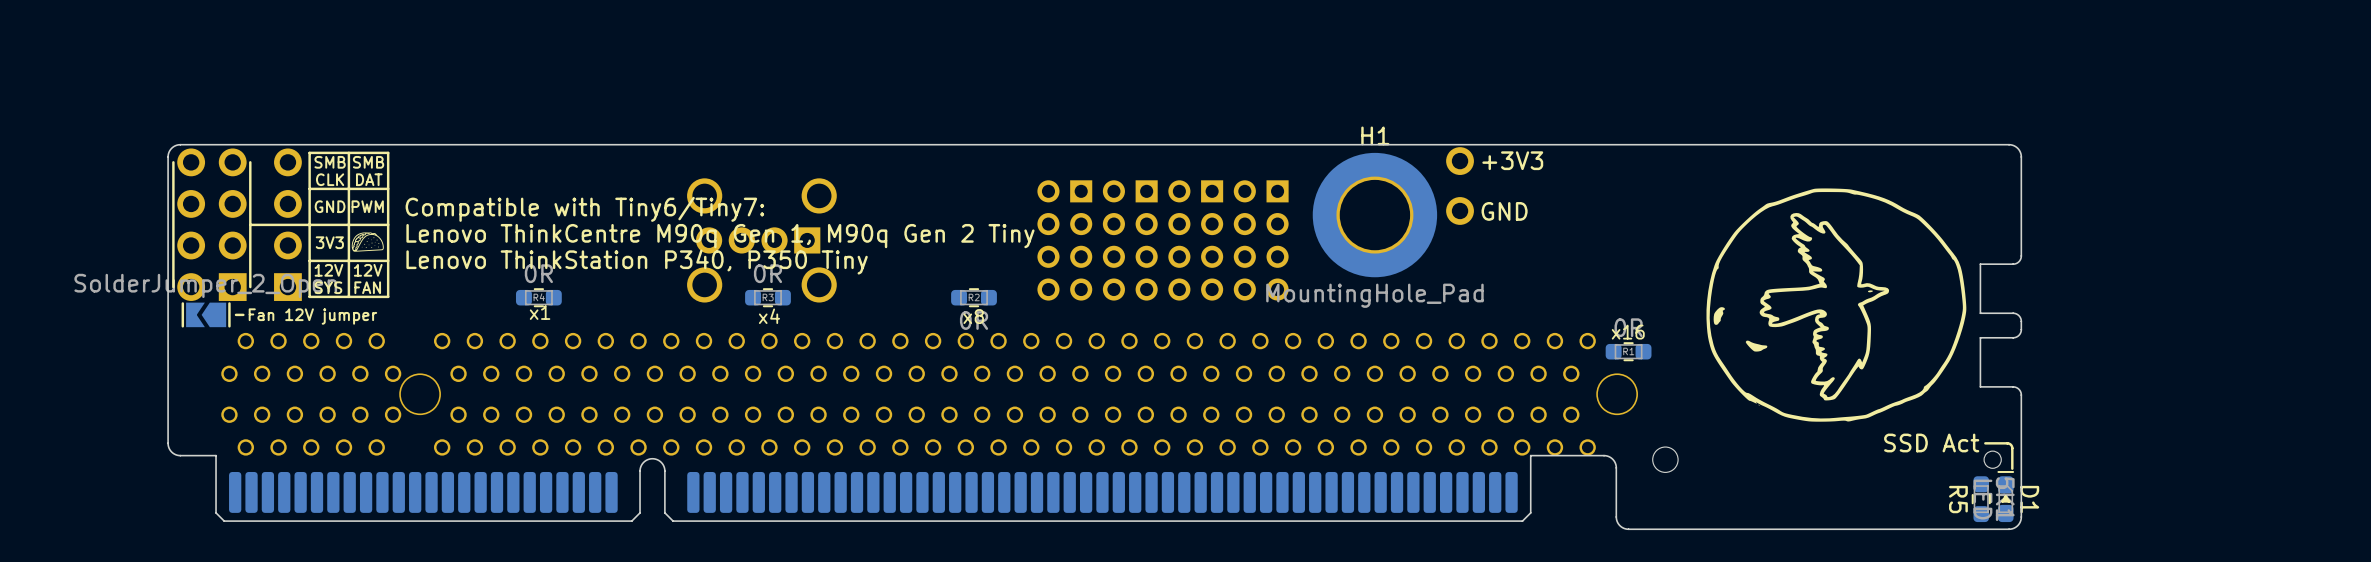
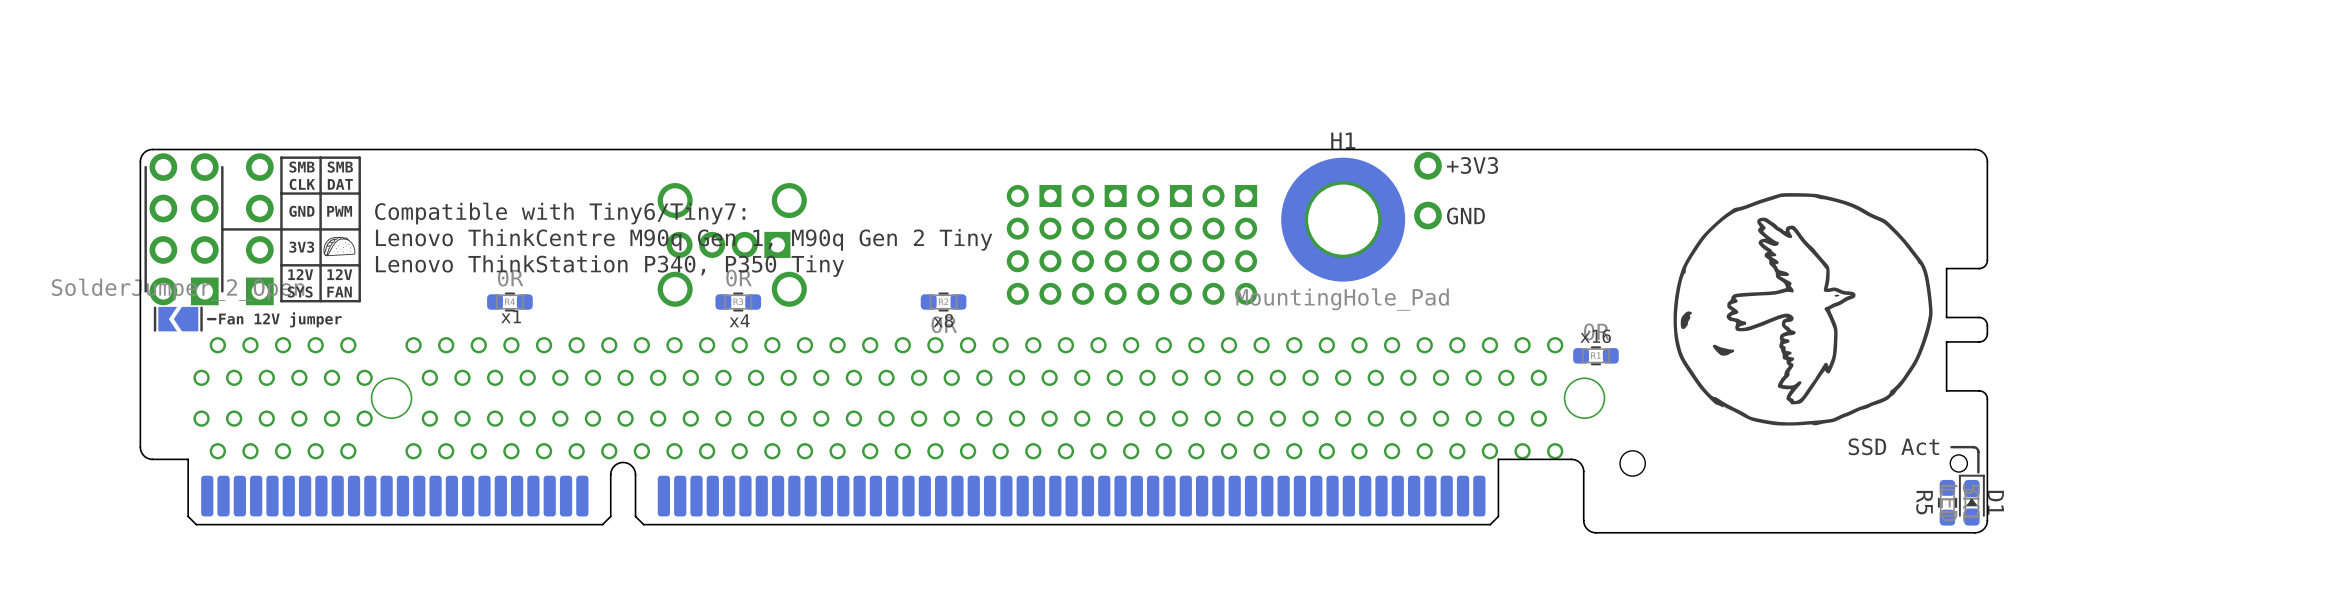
D1 footprint: [1997, 471, 2015, 523] -> [1958, 474, 1985, 526]

